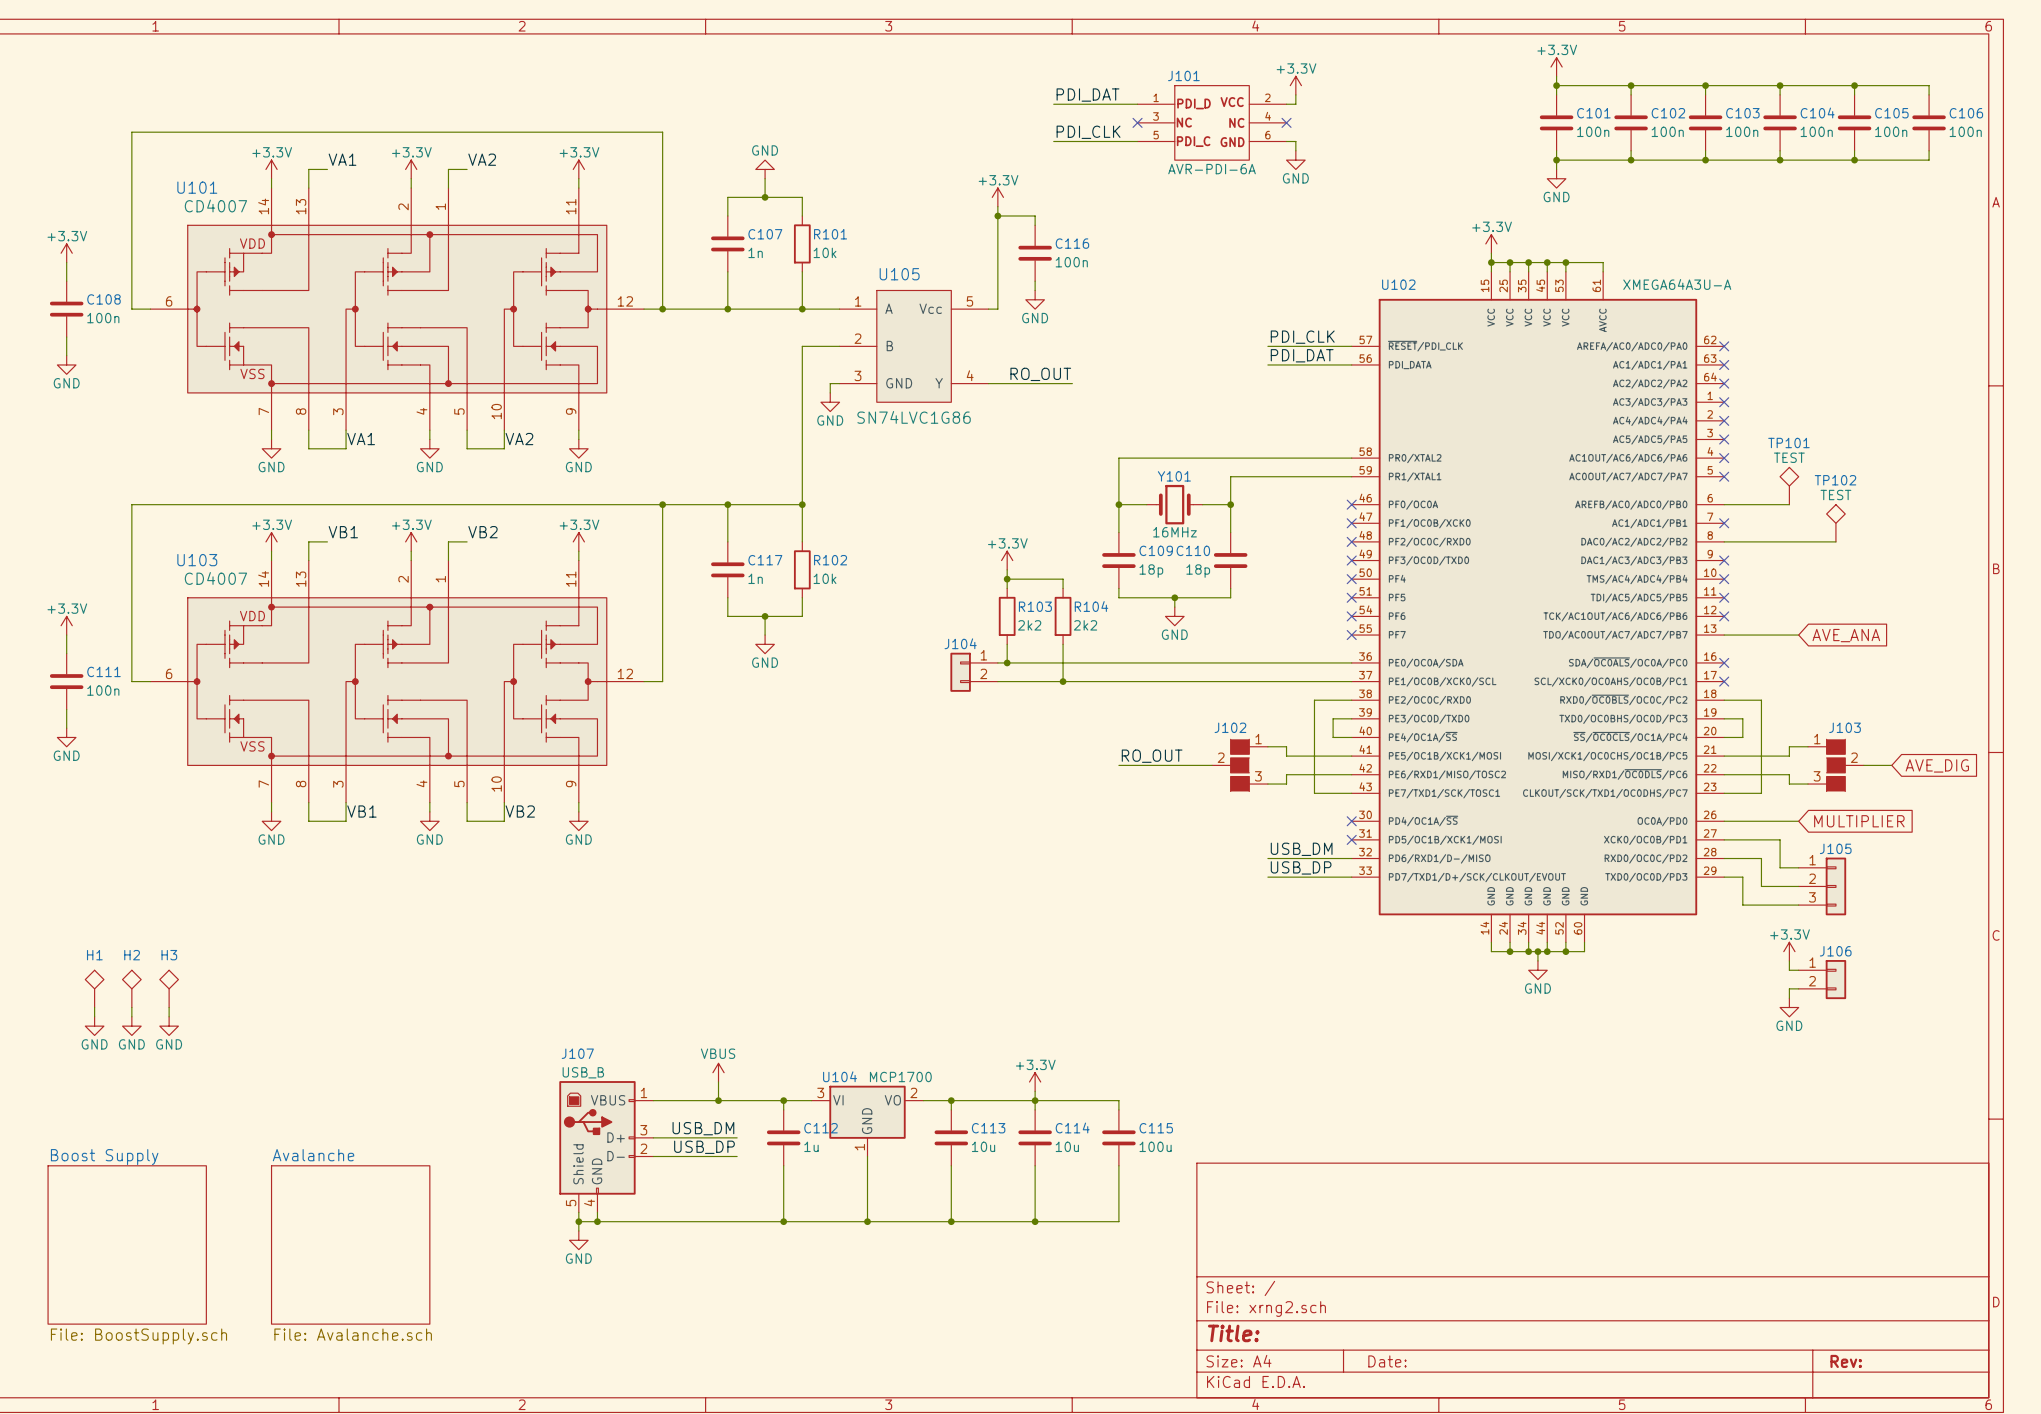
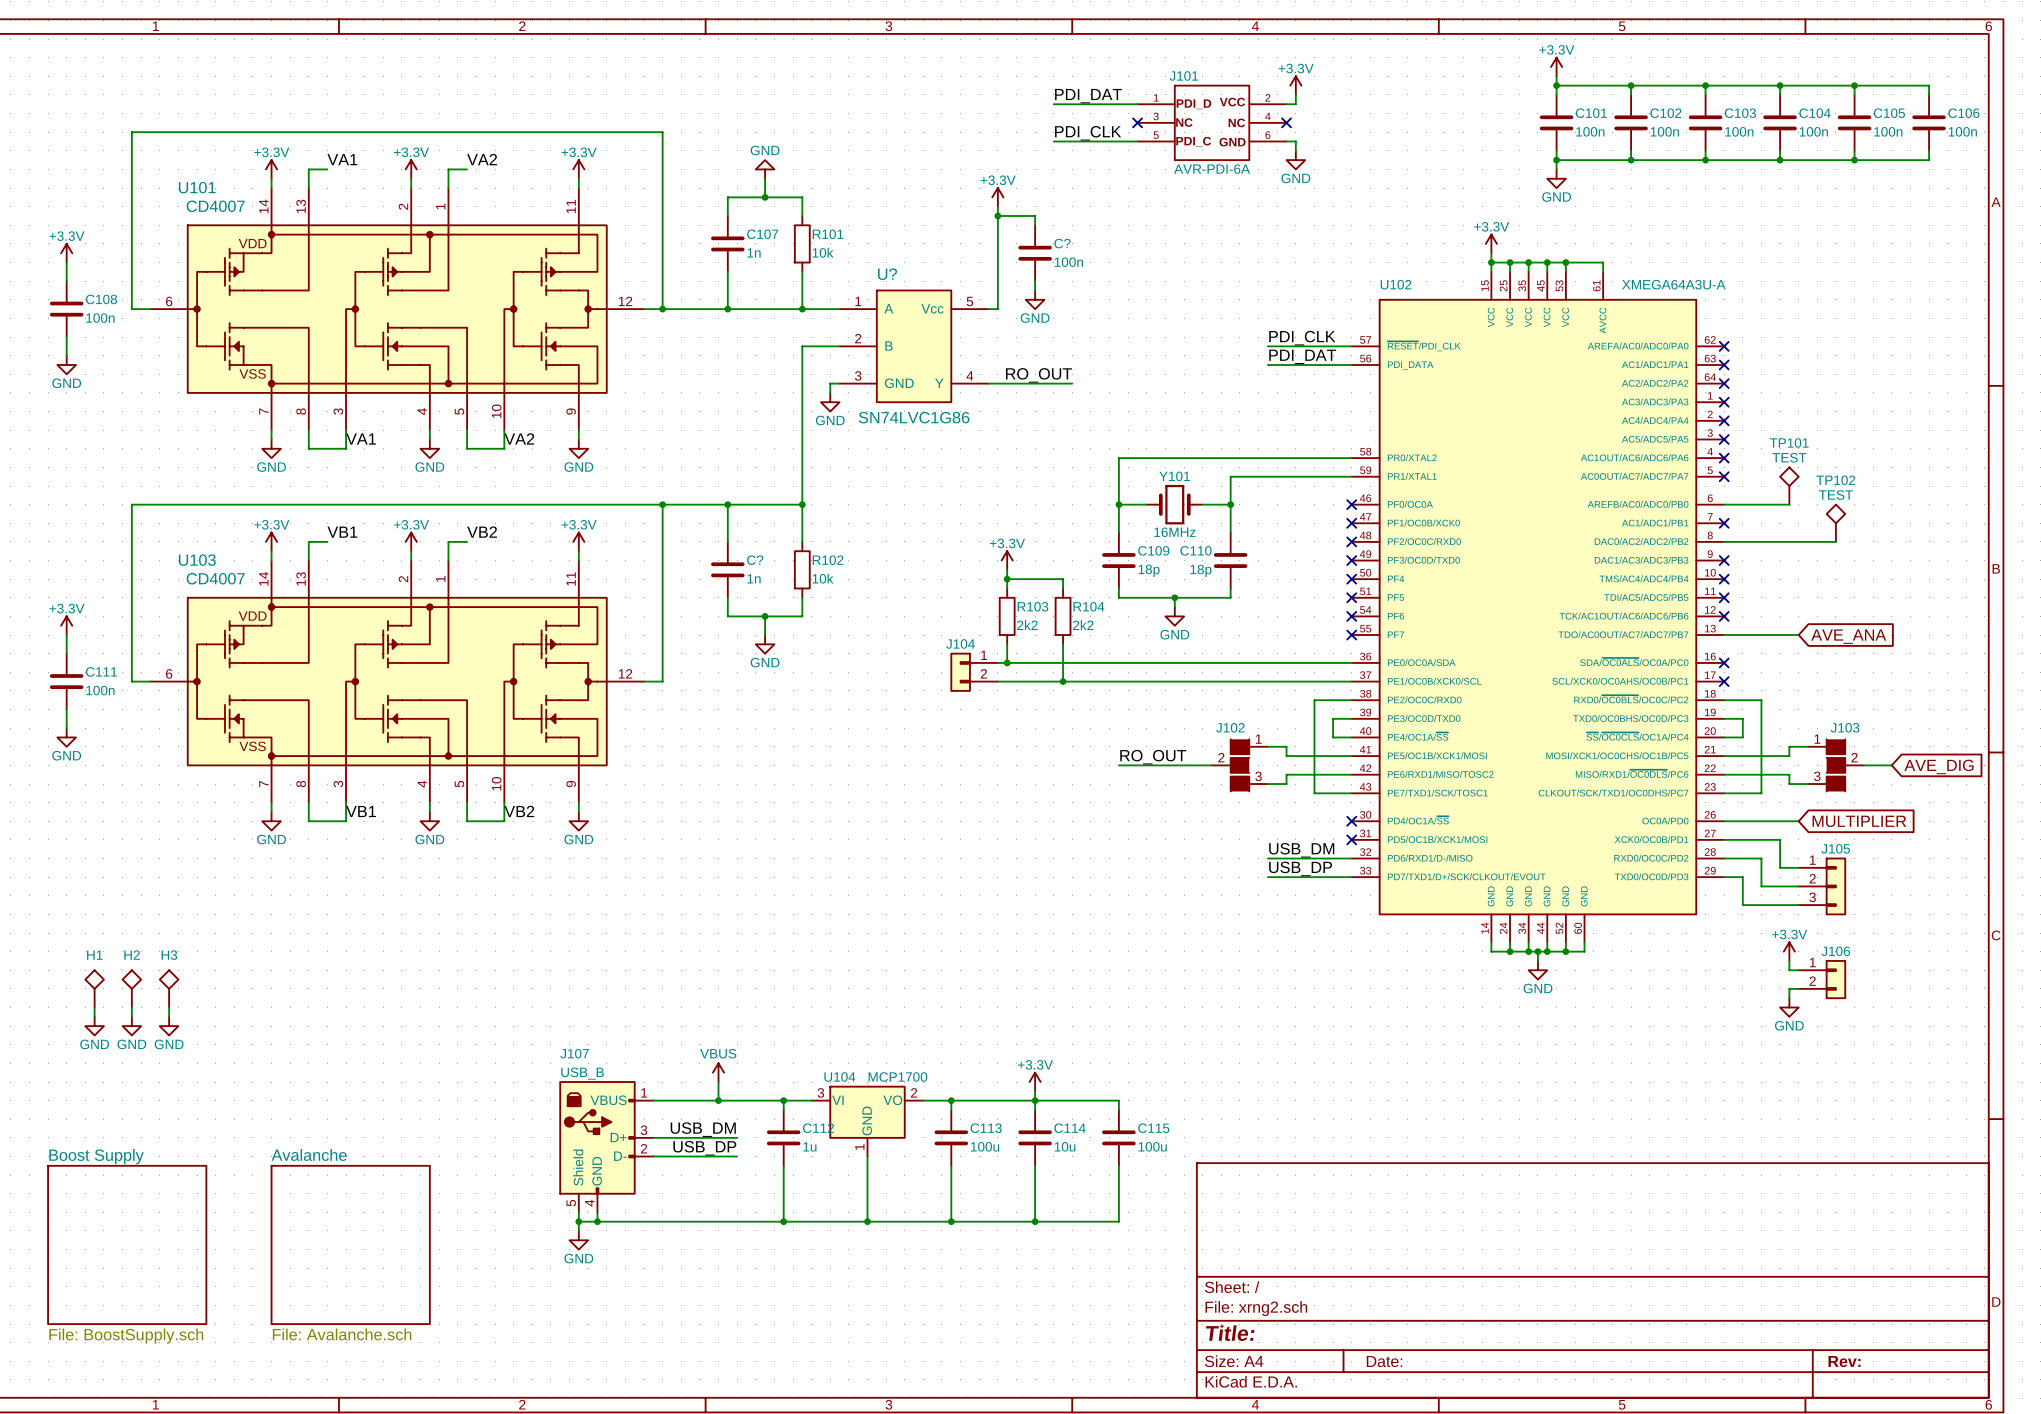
C116 name: C116 (1072, 243) -> C? (1062, 243)
U105 name: U105 (899, 274) -> U? (887, 274)
C117 name: C117 (765, 560) -> C? (755, 560)
C113 value: 10u (983, 1146) -> 100u (985, 1146)

